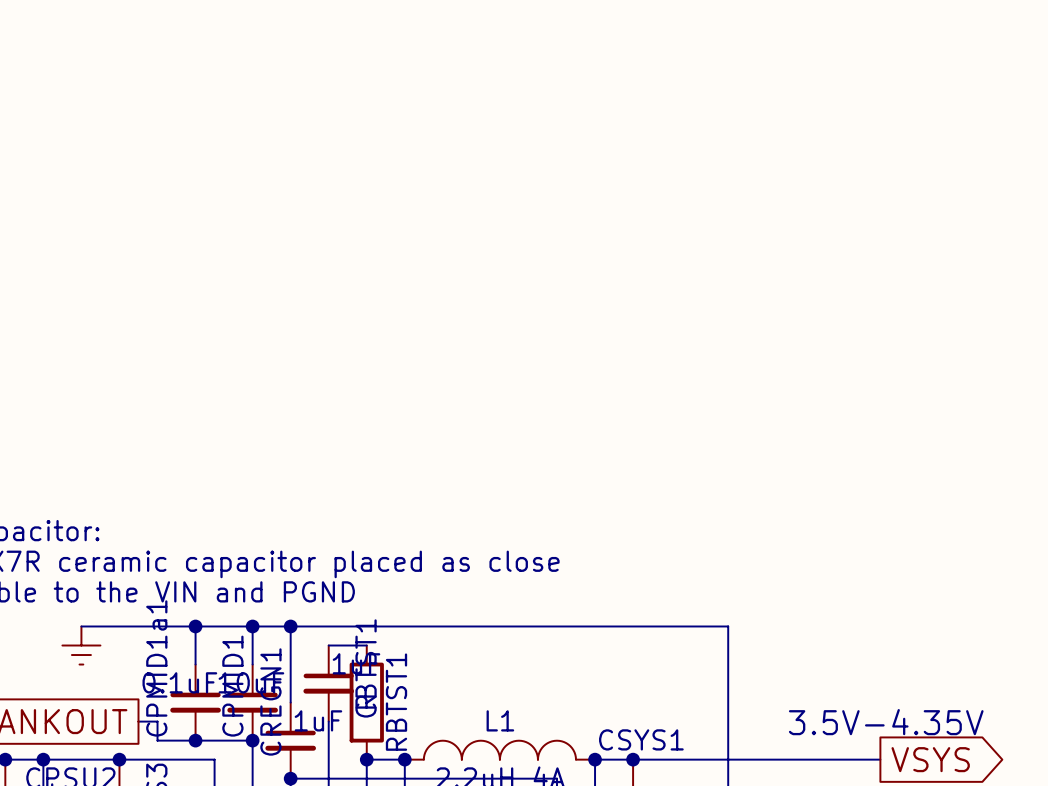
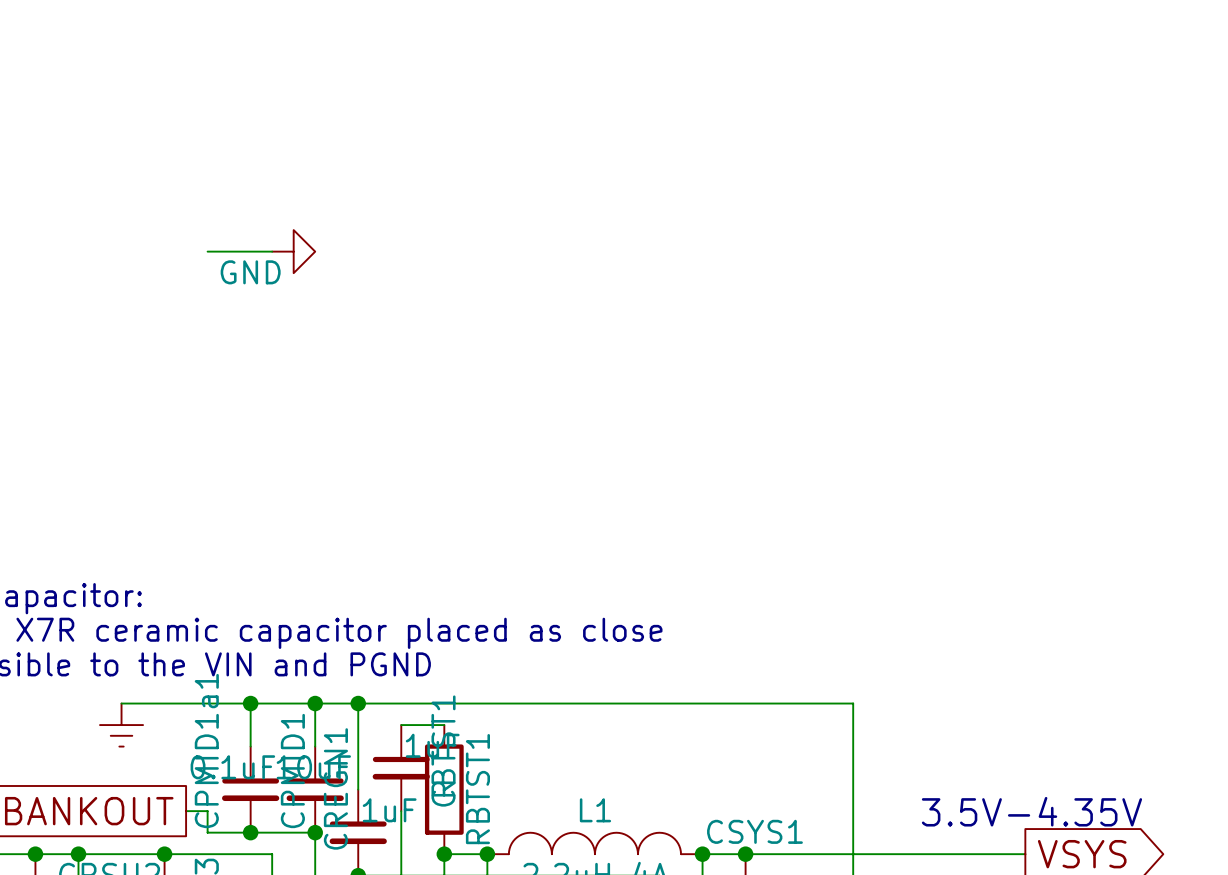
wire: none -> (207, 251) (272, 251)
power symbol: none -> GND (293, 251)

